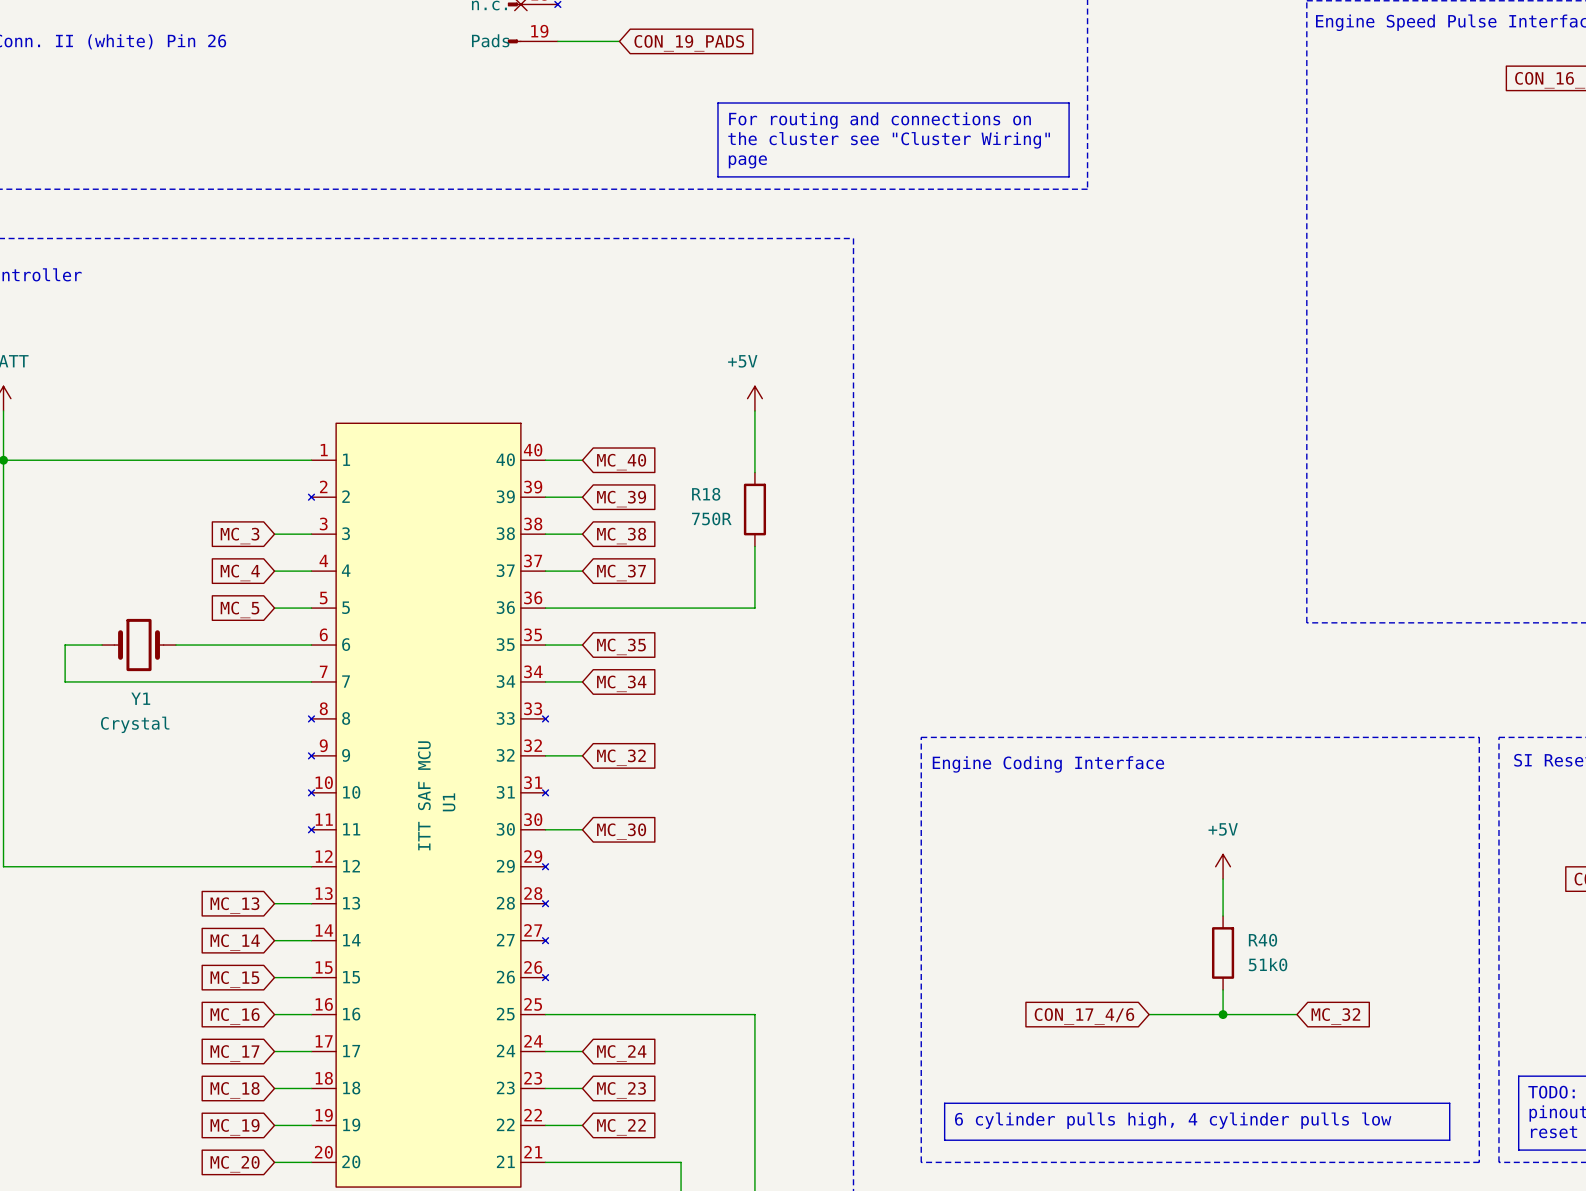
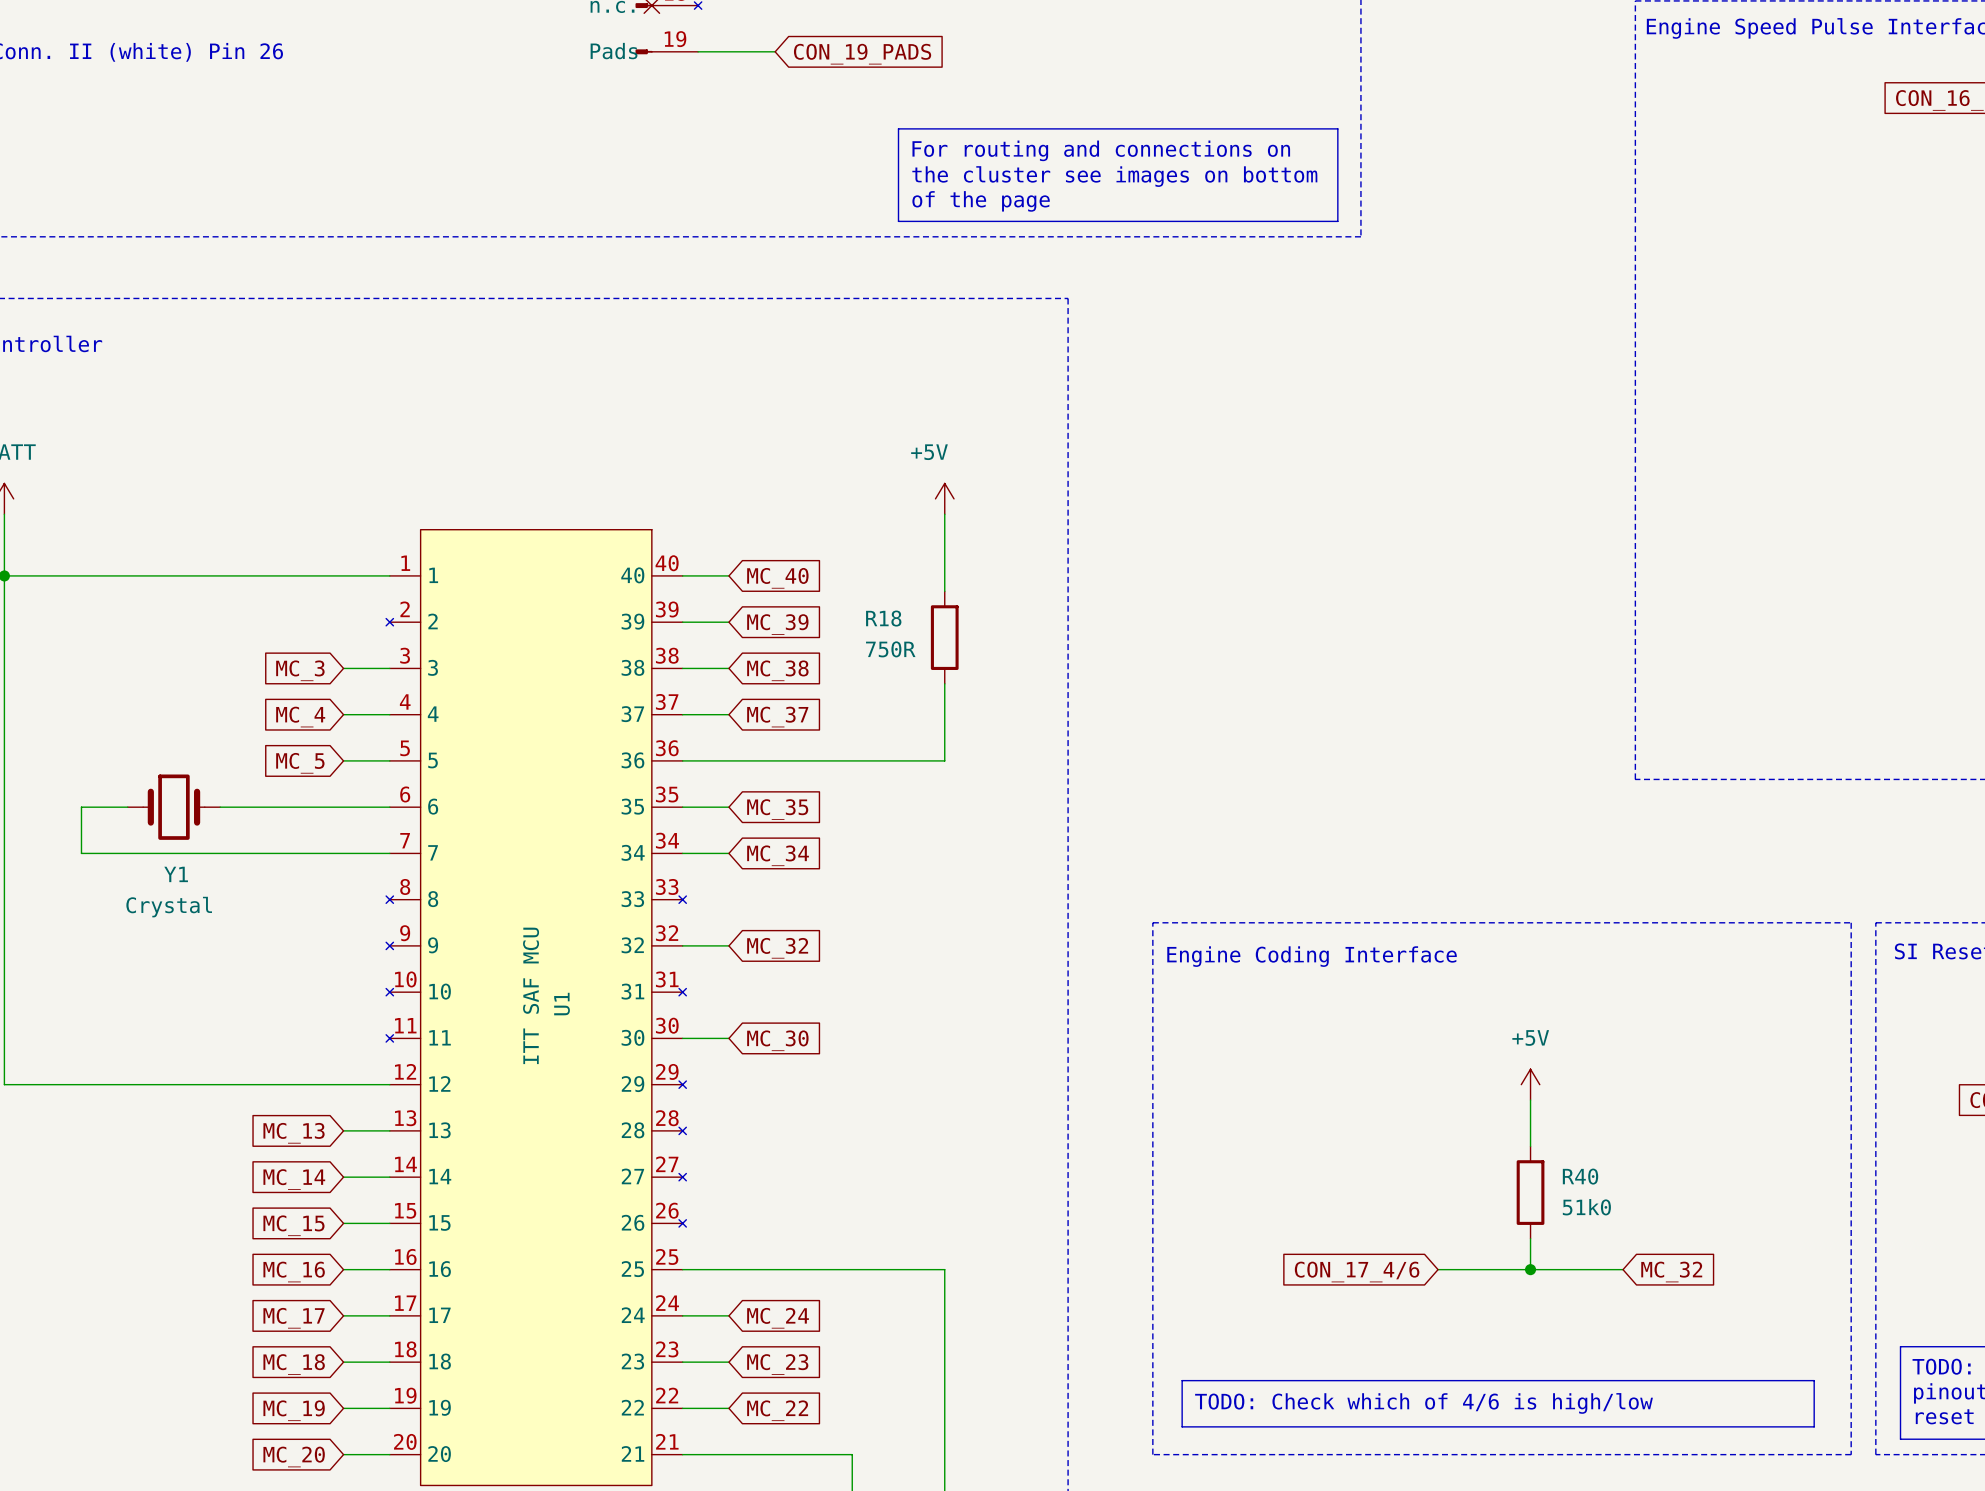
text: the cluster see "Cluster Wiring" (889, 140) -> the cluster see images on bottom (1114, 176)
text: page (747, 161) -> of the page (981, 201)
text: 6 cylinder pulls high, 4 cylinder pulls low (1173, 1120) -> TODO: Check which of 4/6 is high/low (1424, 1403)

